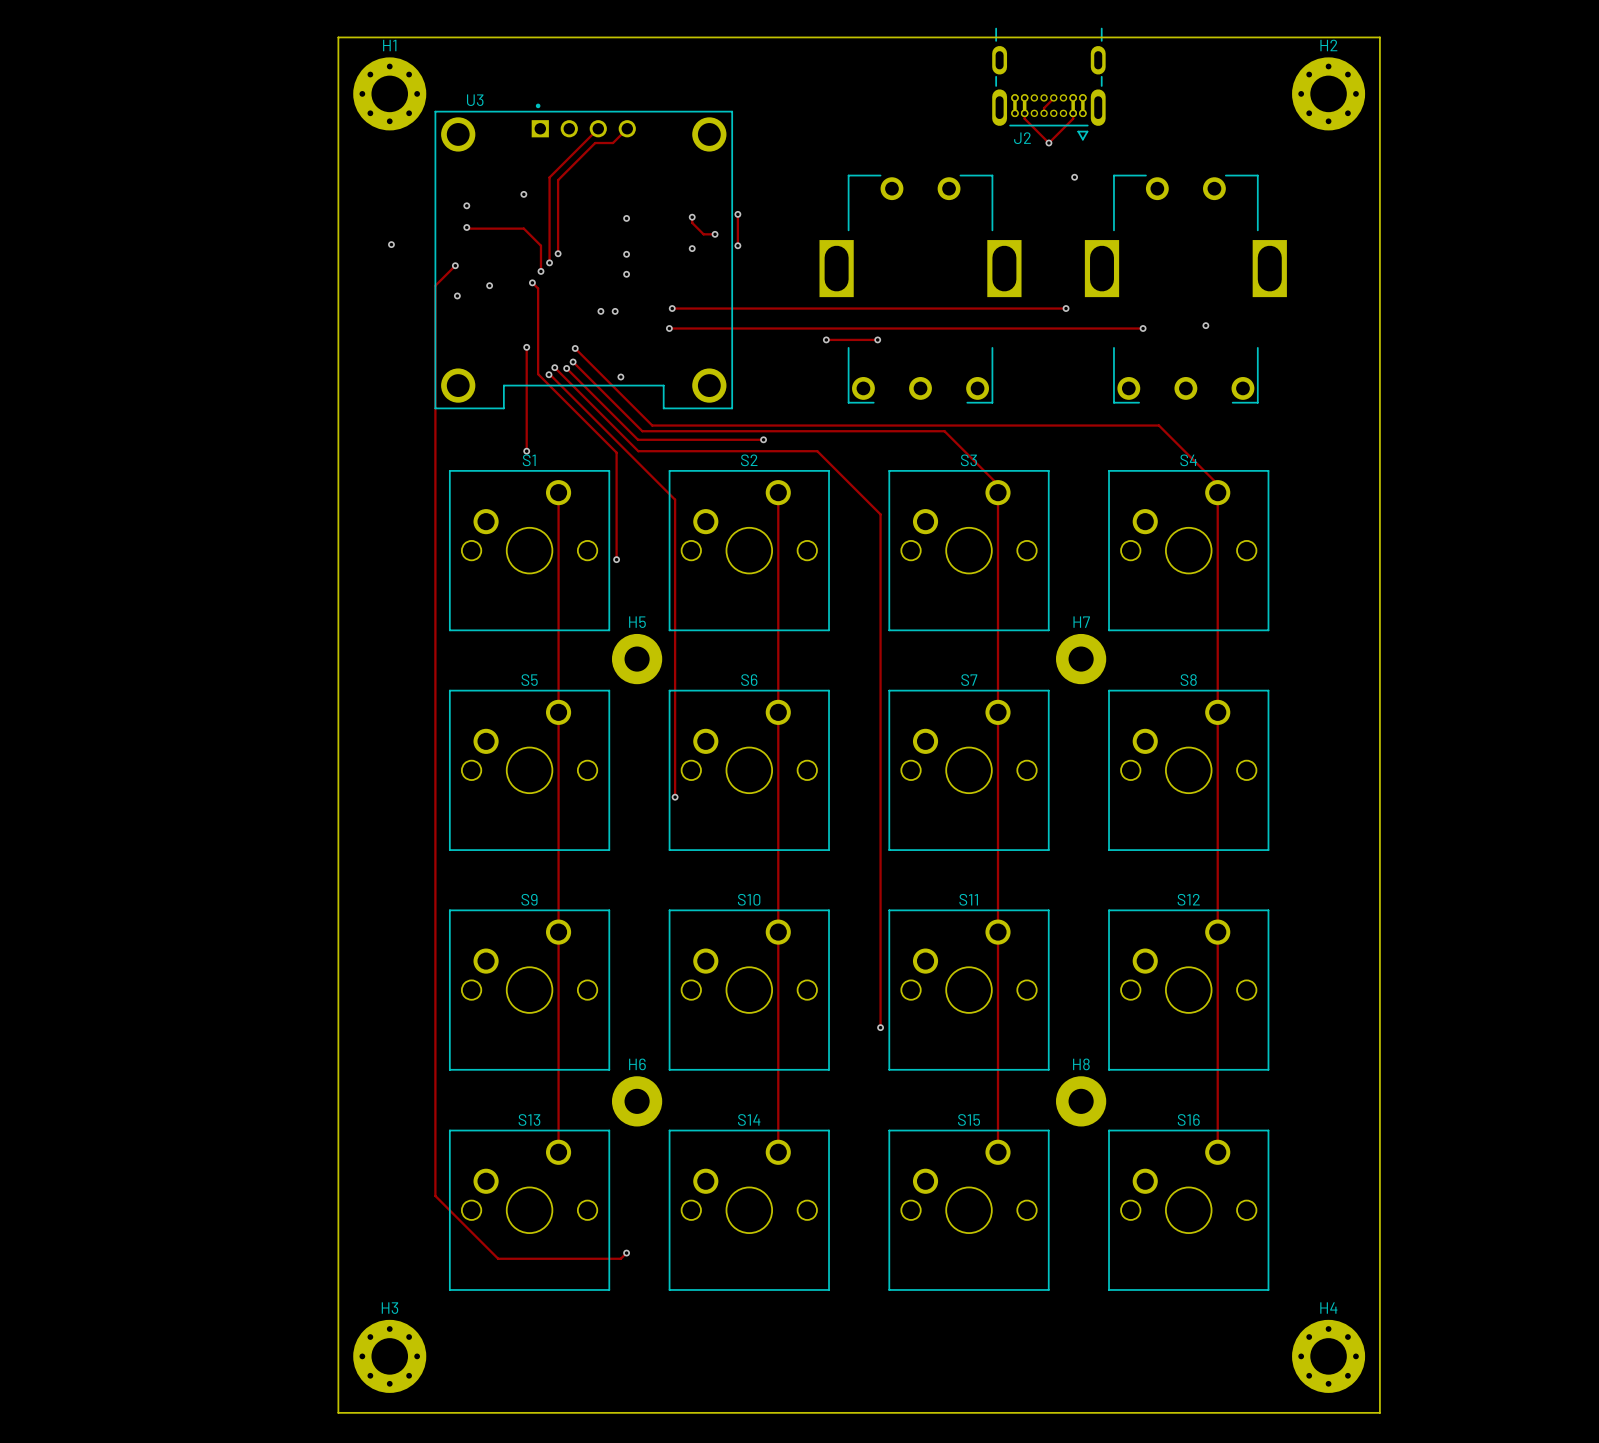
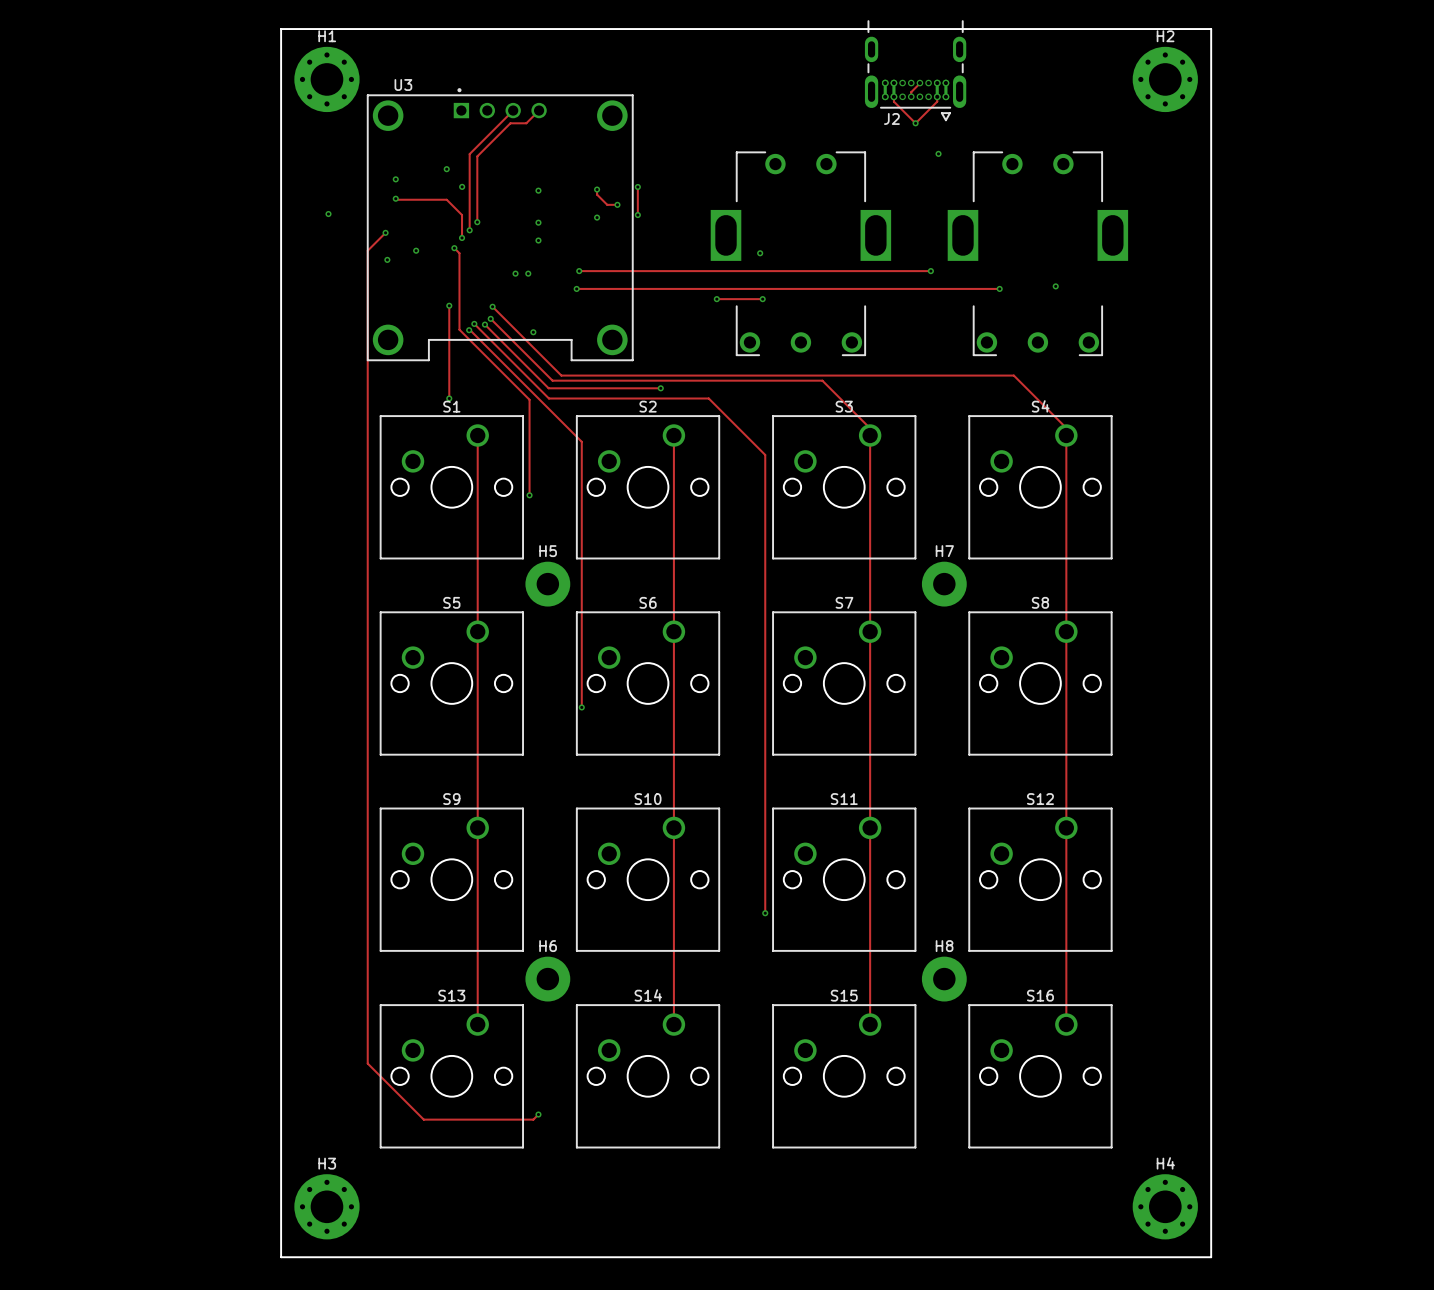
via: none -> (462, 186)
via: none -> (760, 253)

